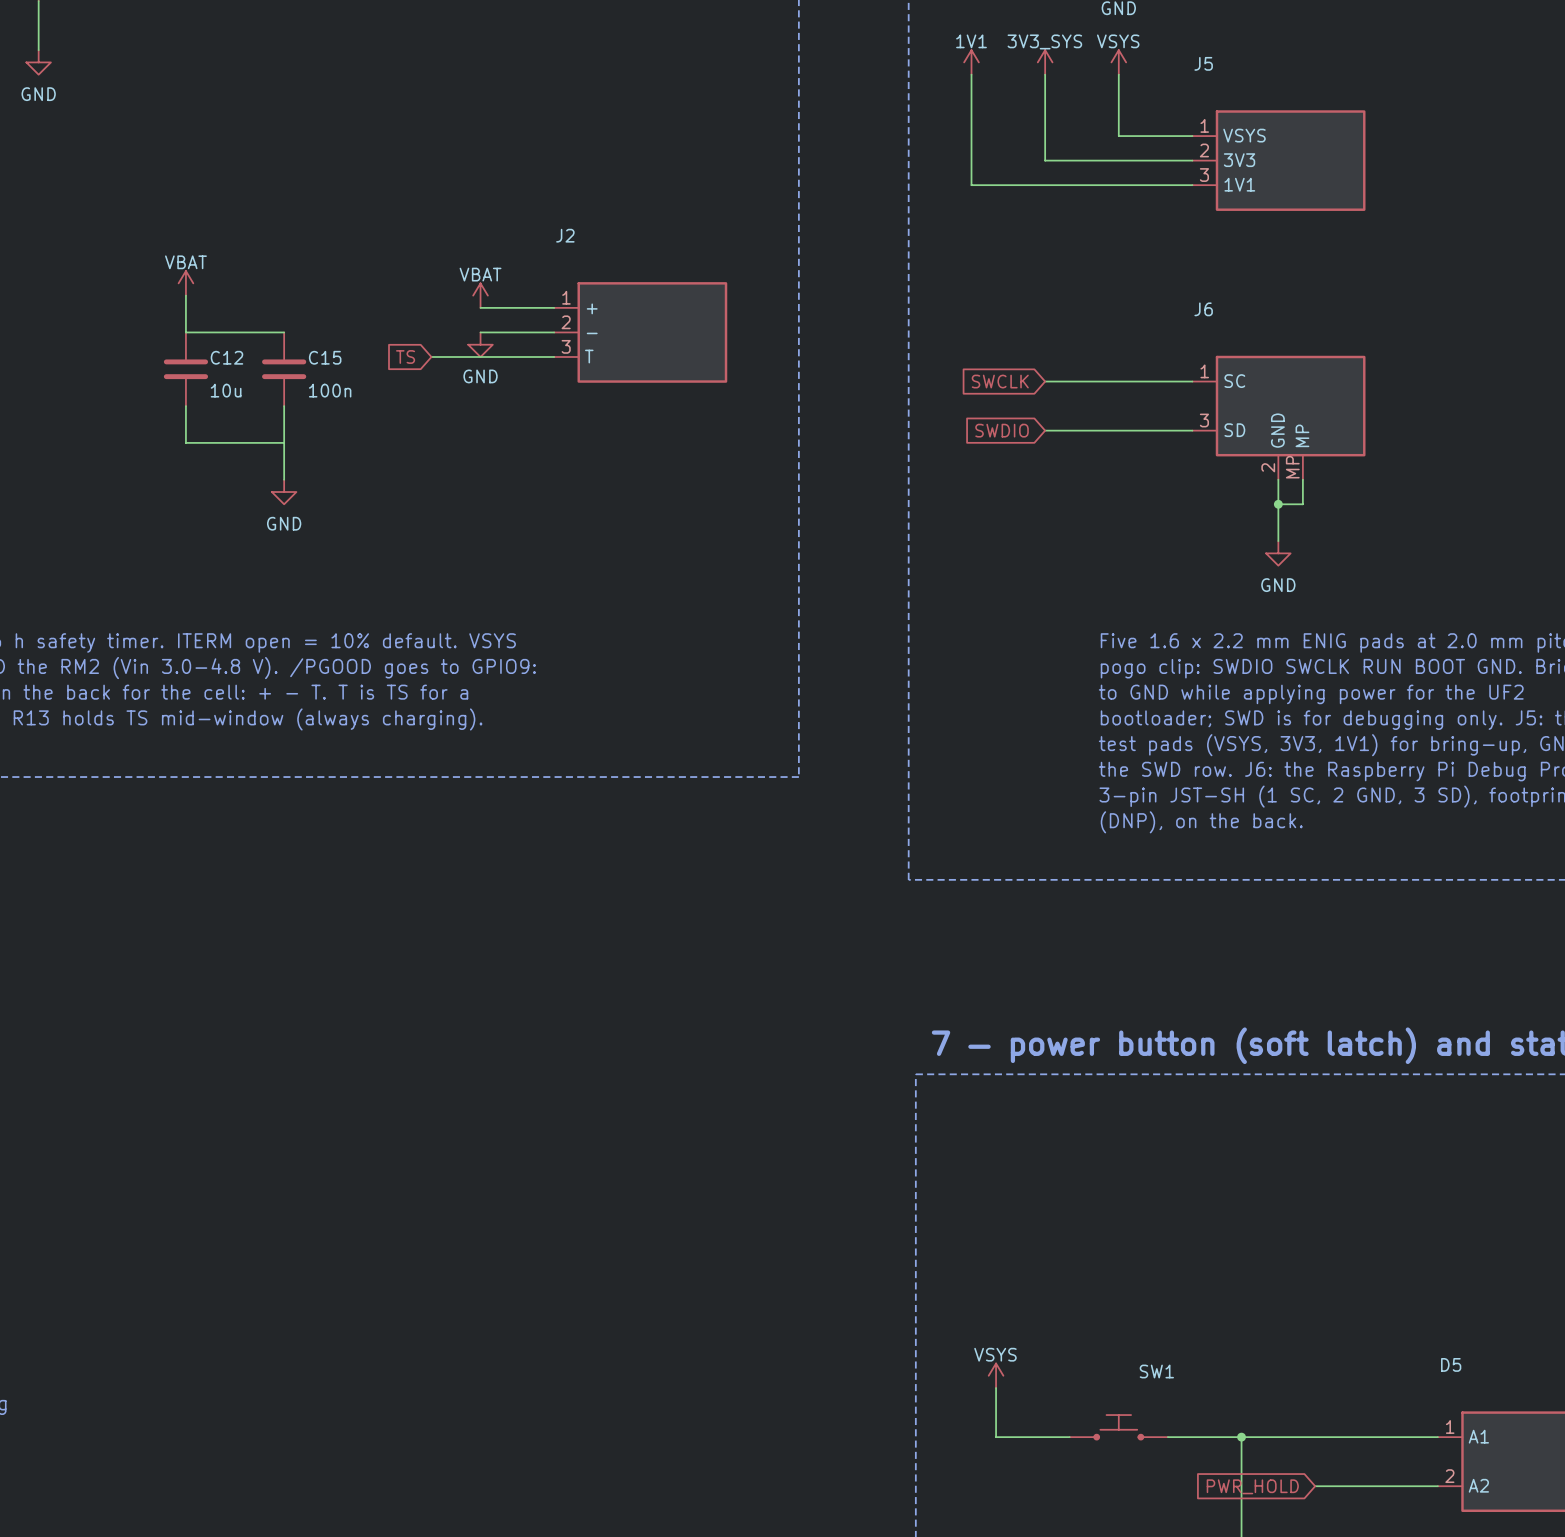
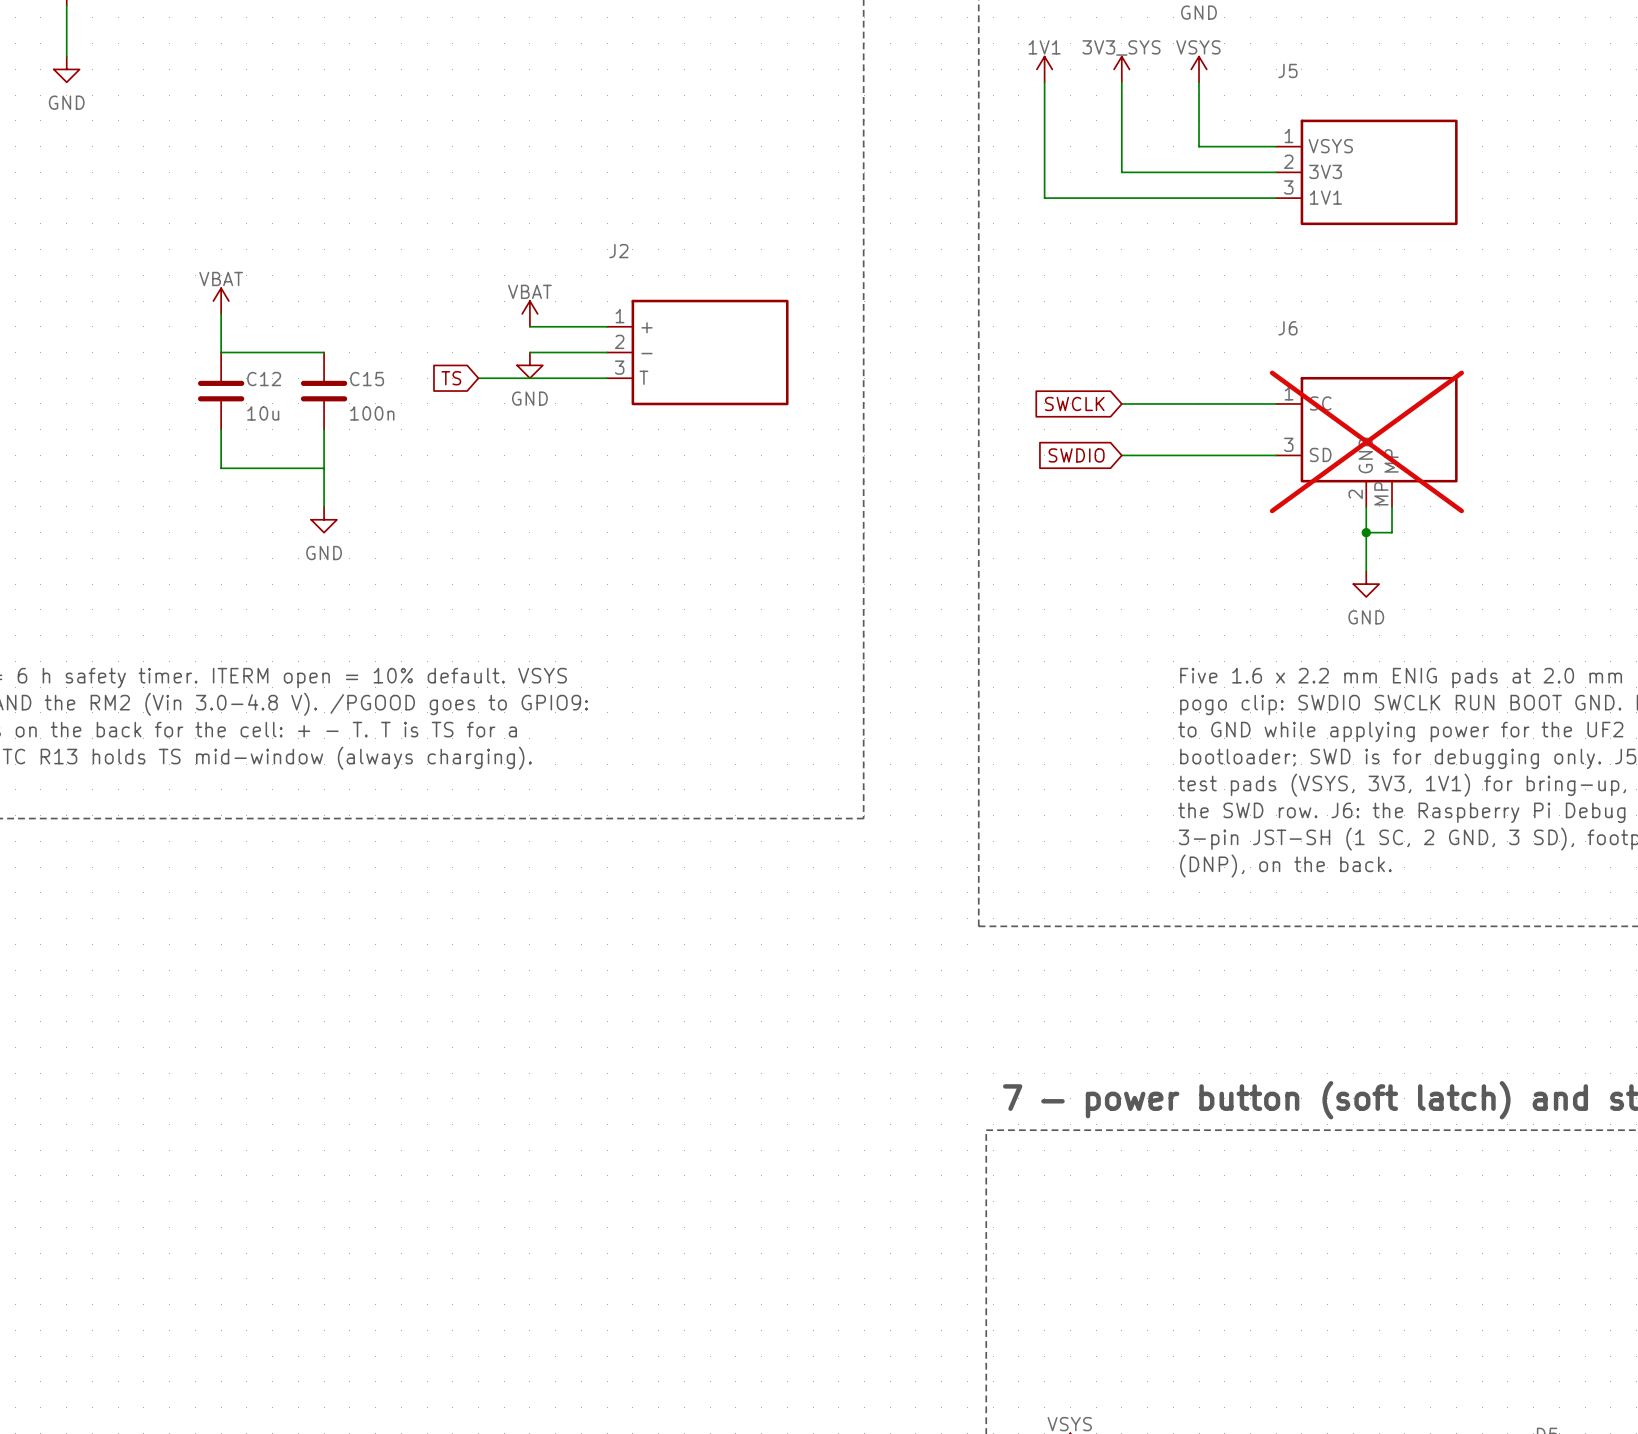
J6 do-not-place cross: none -> (1366, 441)

